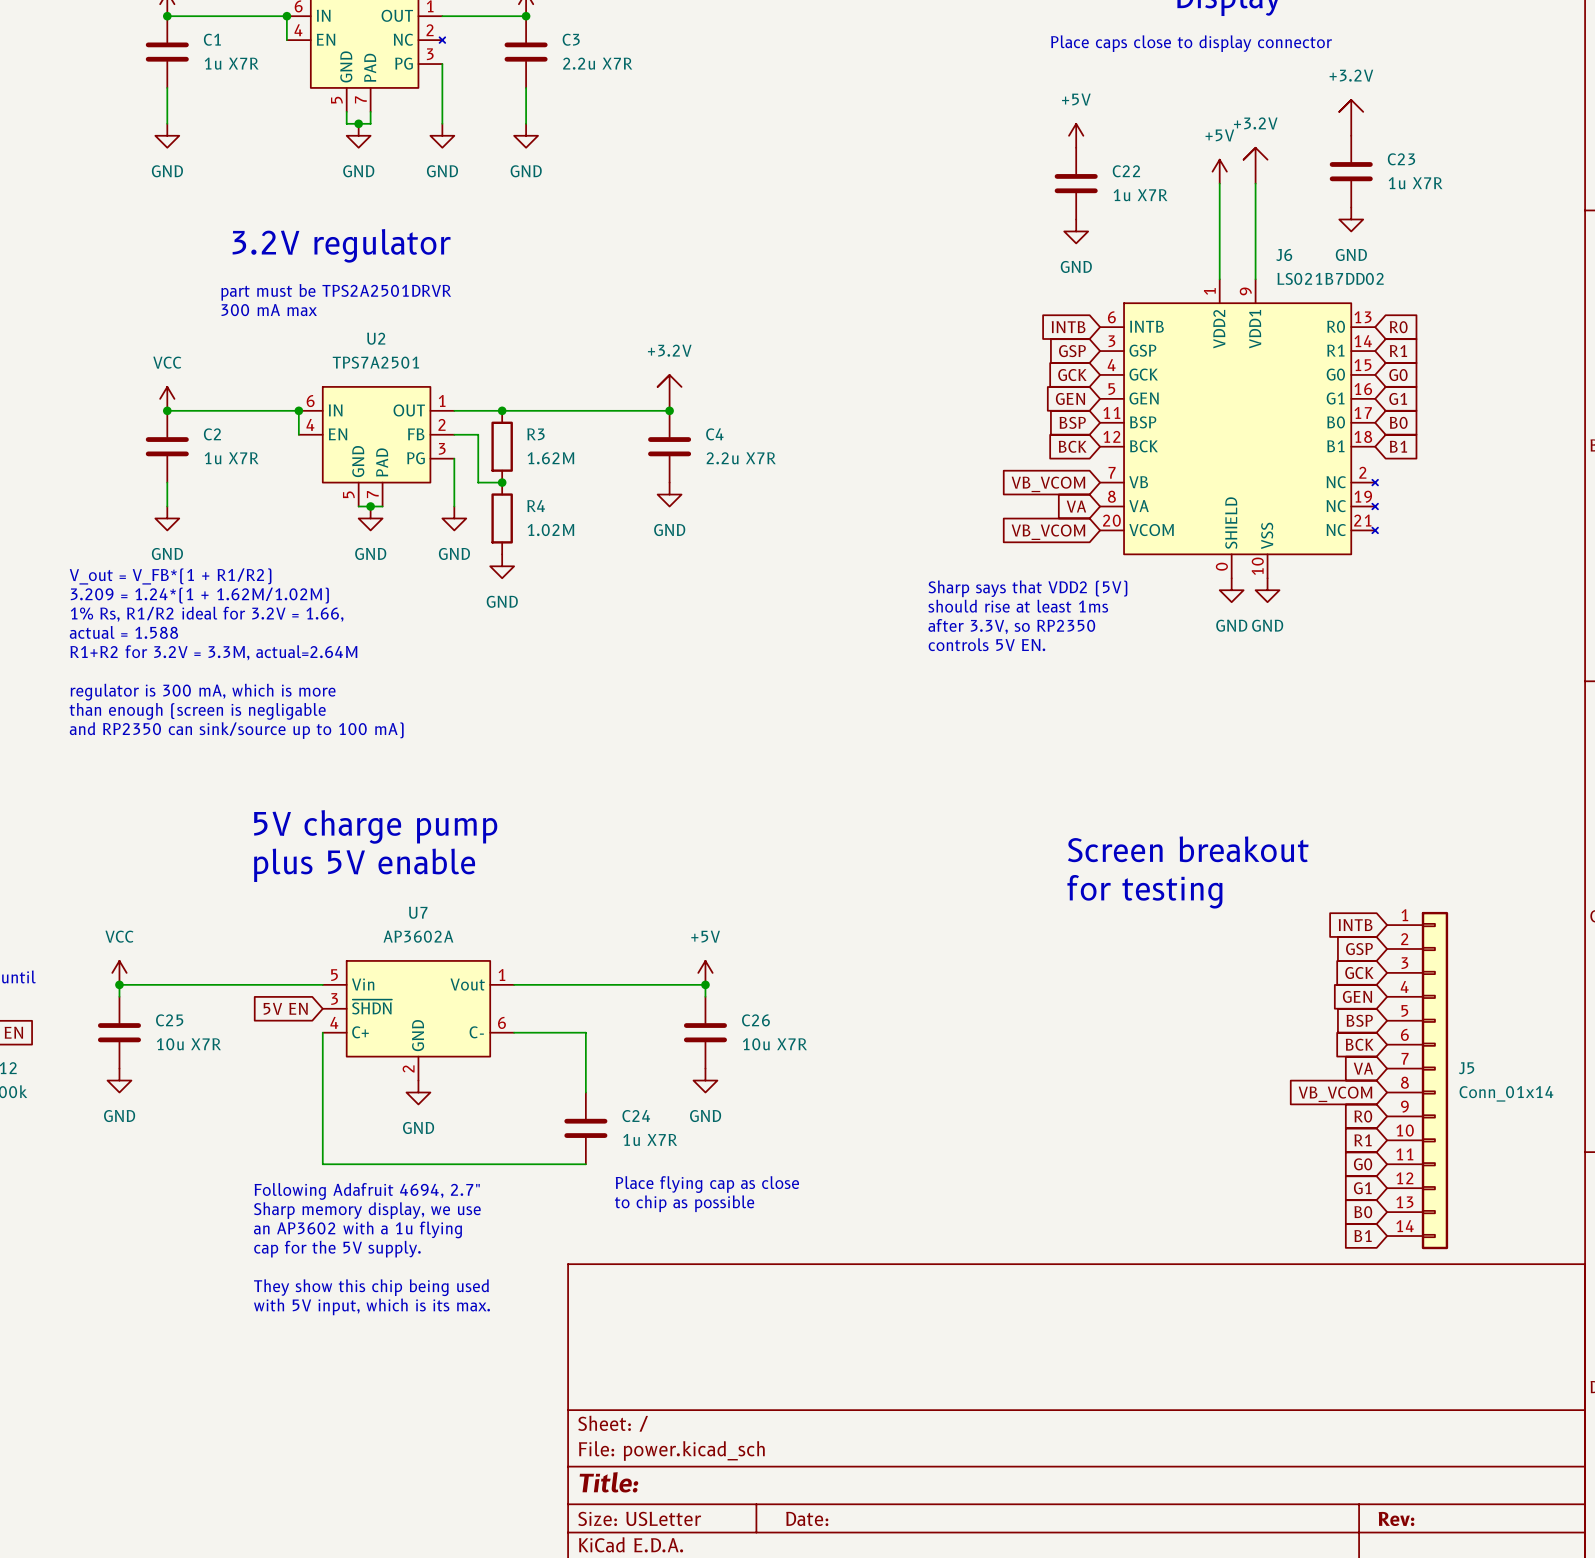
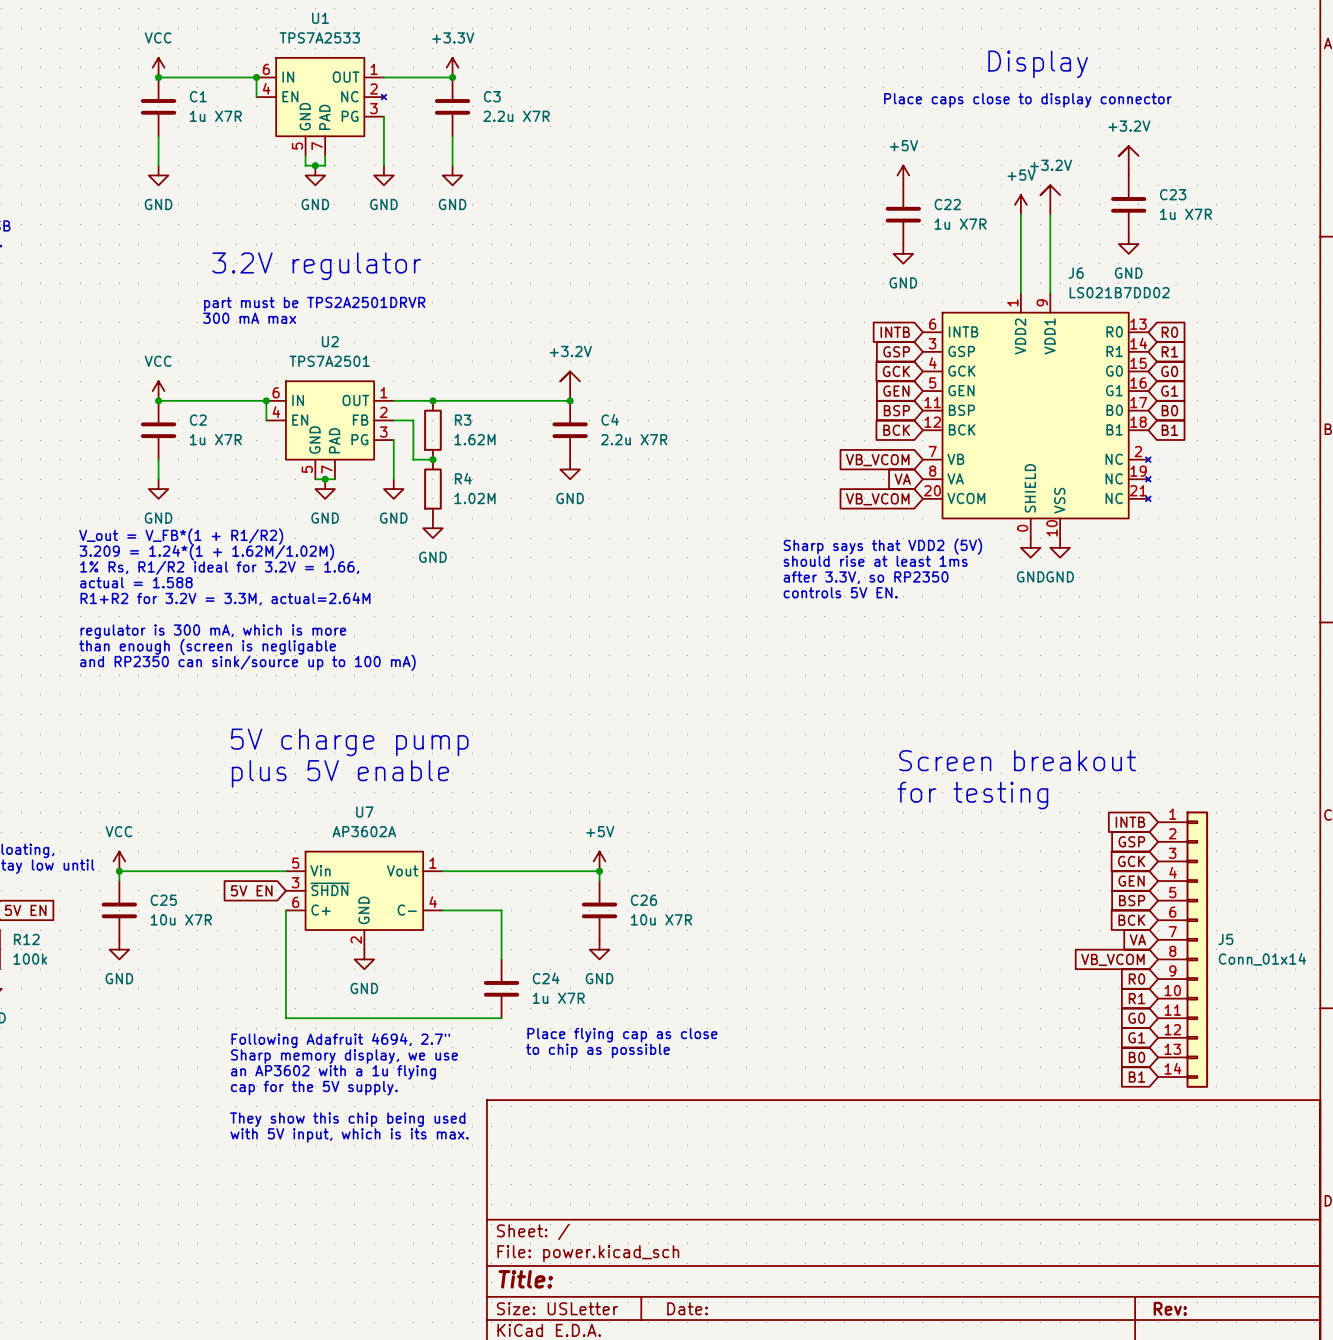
U7 pin number: 4 (334, 1022) -> 6 (295, 902)
U7 pin number: 6 (501, 1022) -> 4 (433, 902)

